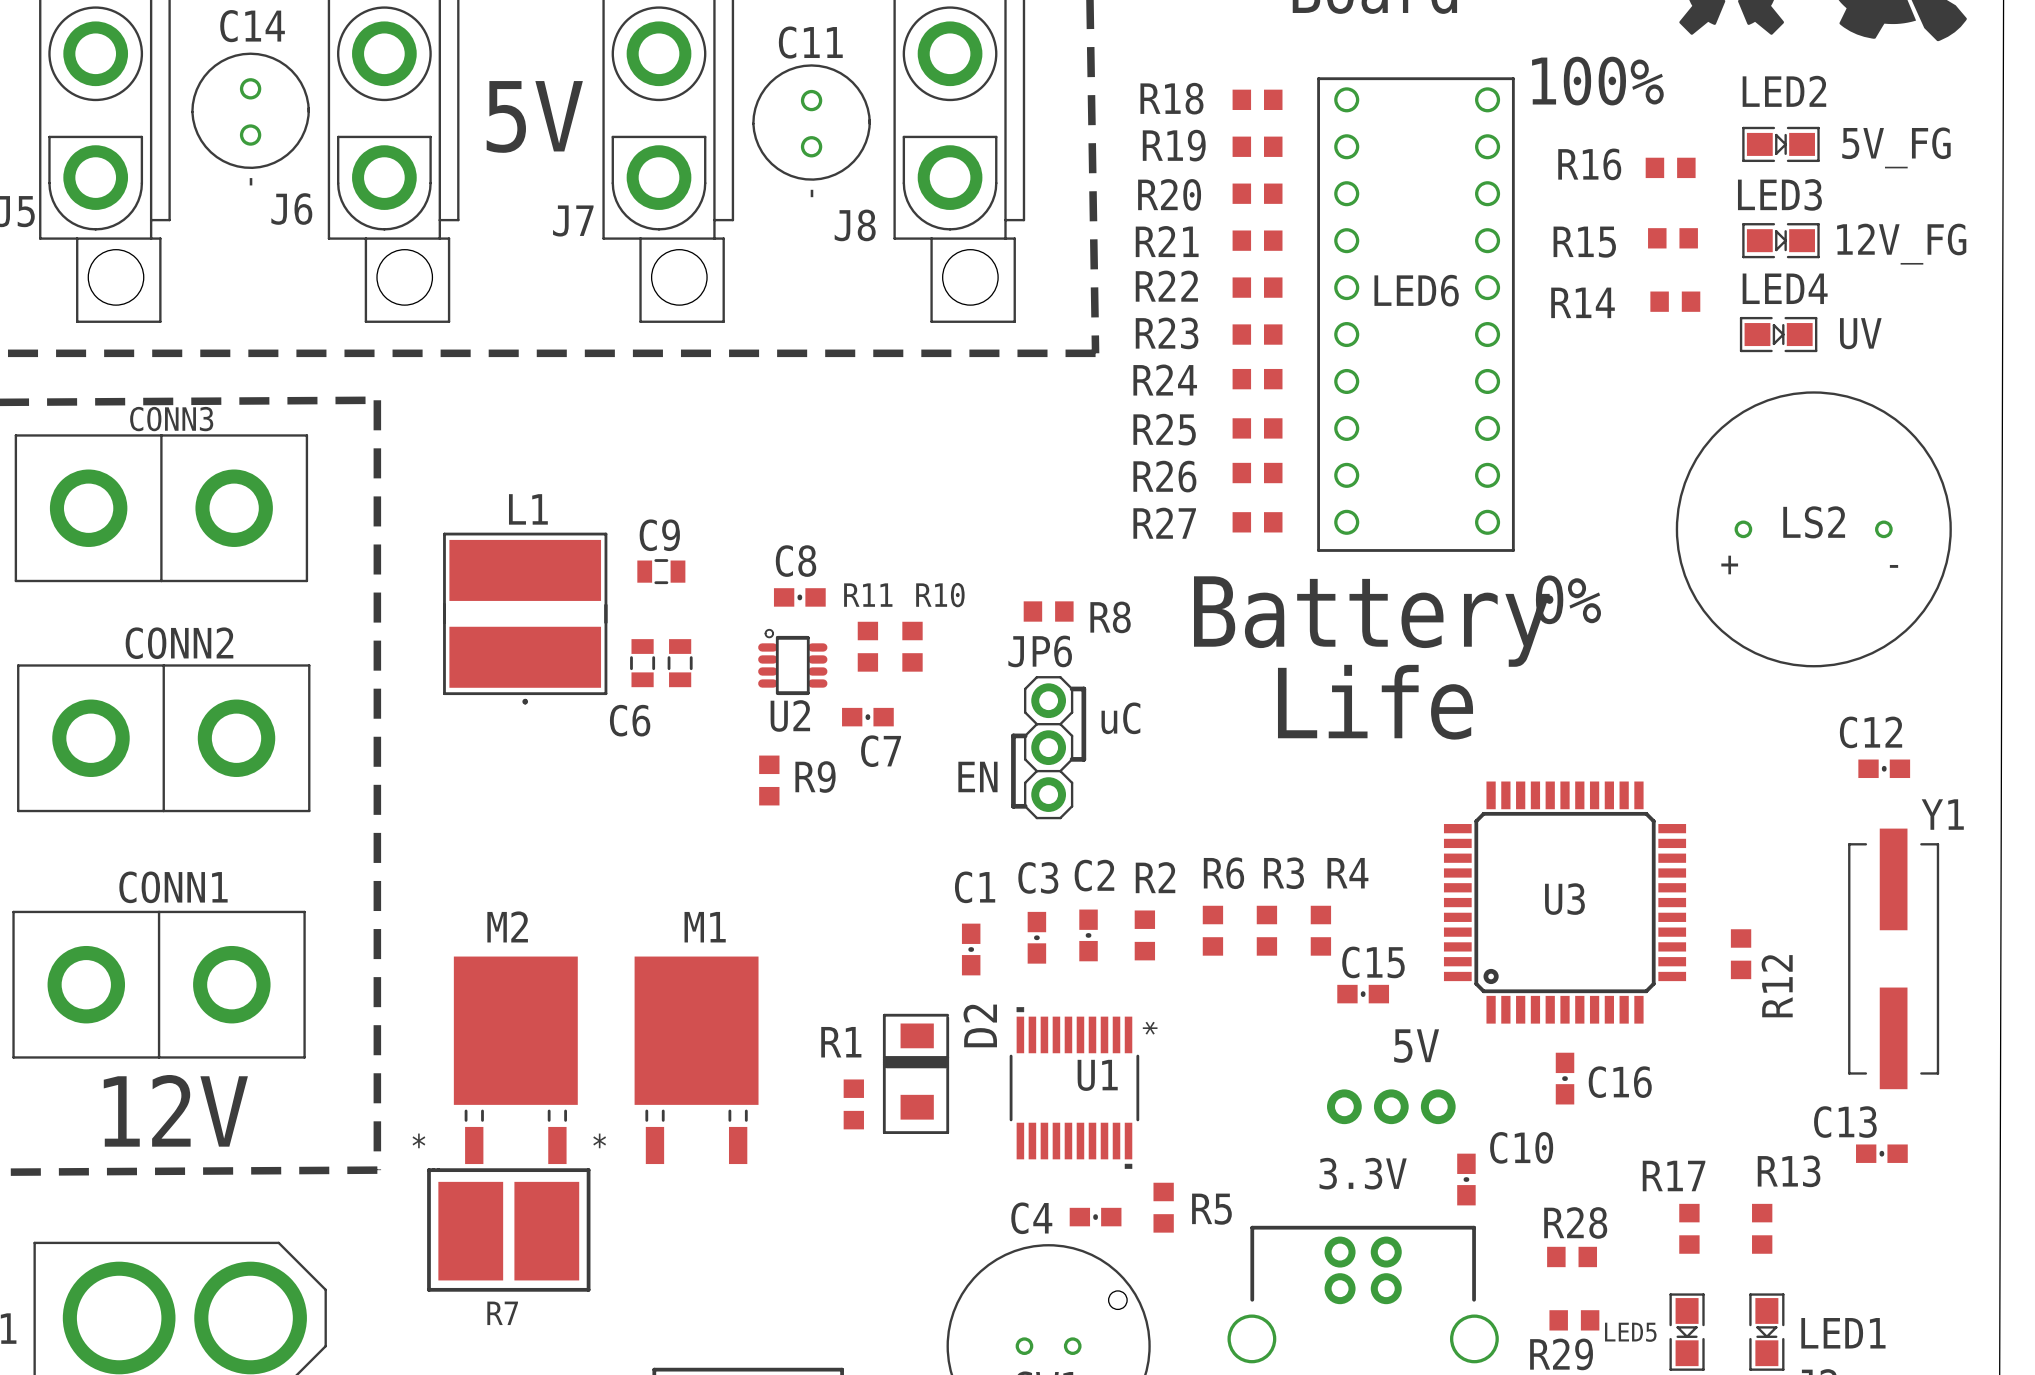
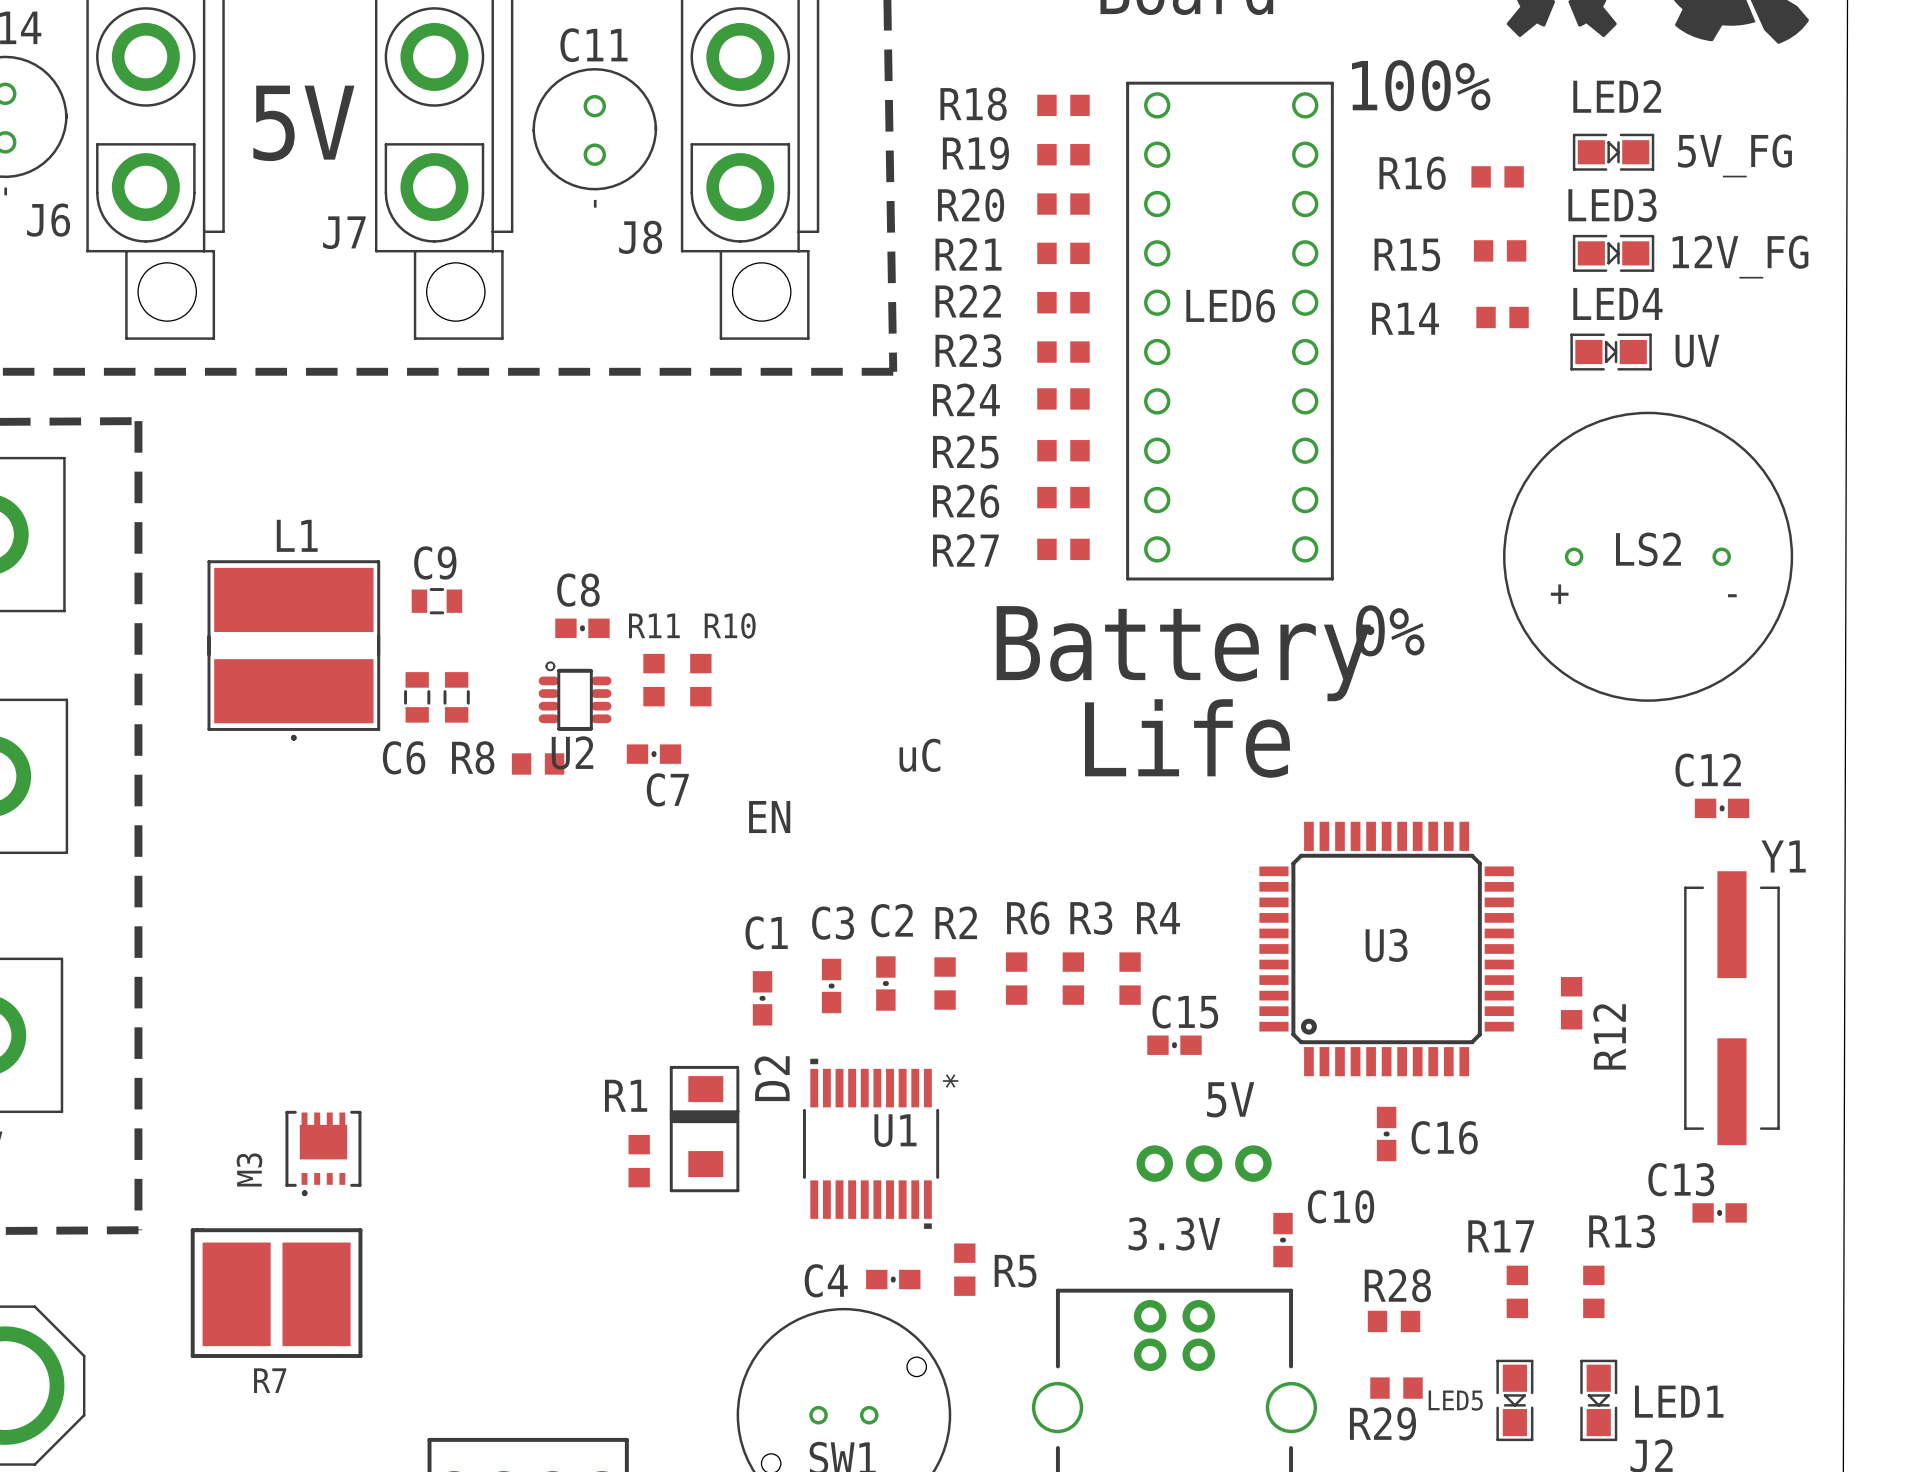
R8 position: (1048, 611) -> (538, 763)
R8 name position: R8 (1110, 617) -> R8 (473, 757)
JP6: (1048, 747) -> none
R9: (769, 780) -> none
M2: (515, 1060) -> none
M1: (696, 1060) -> none
M3: none -> (323, 1153)

